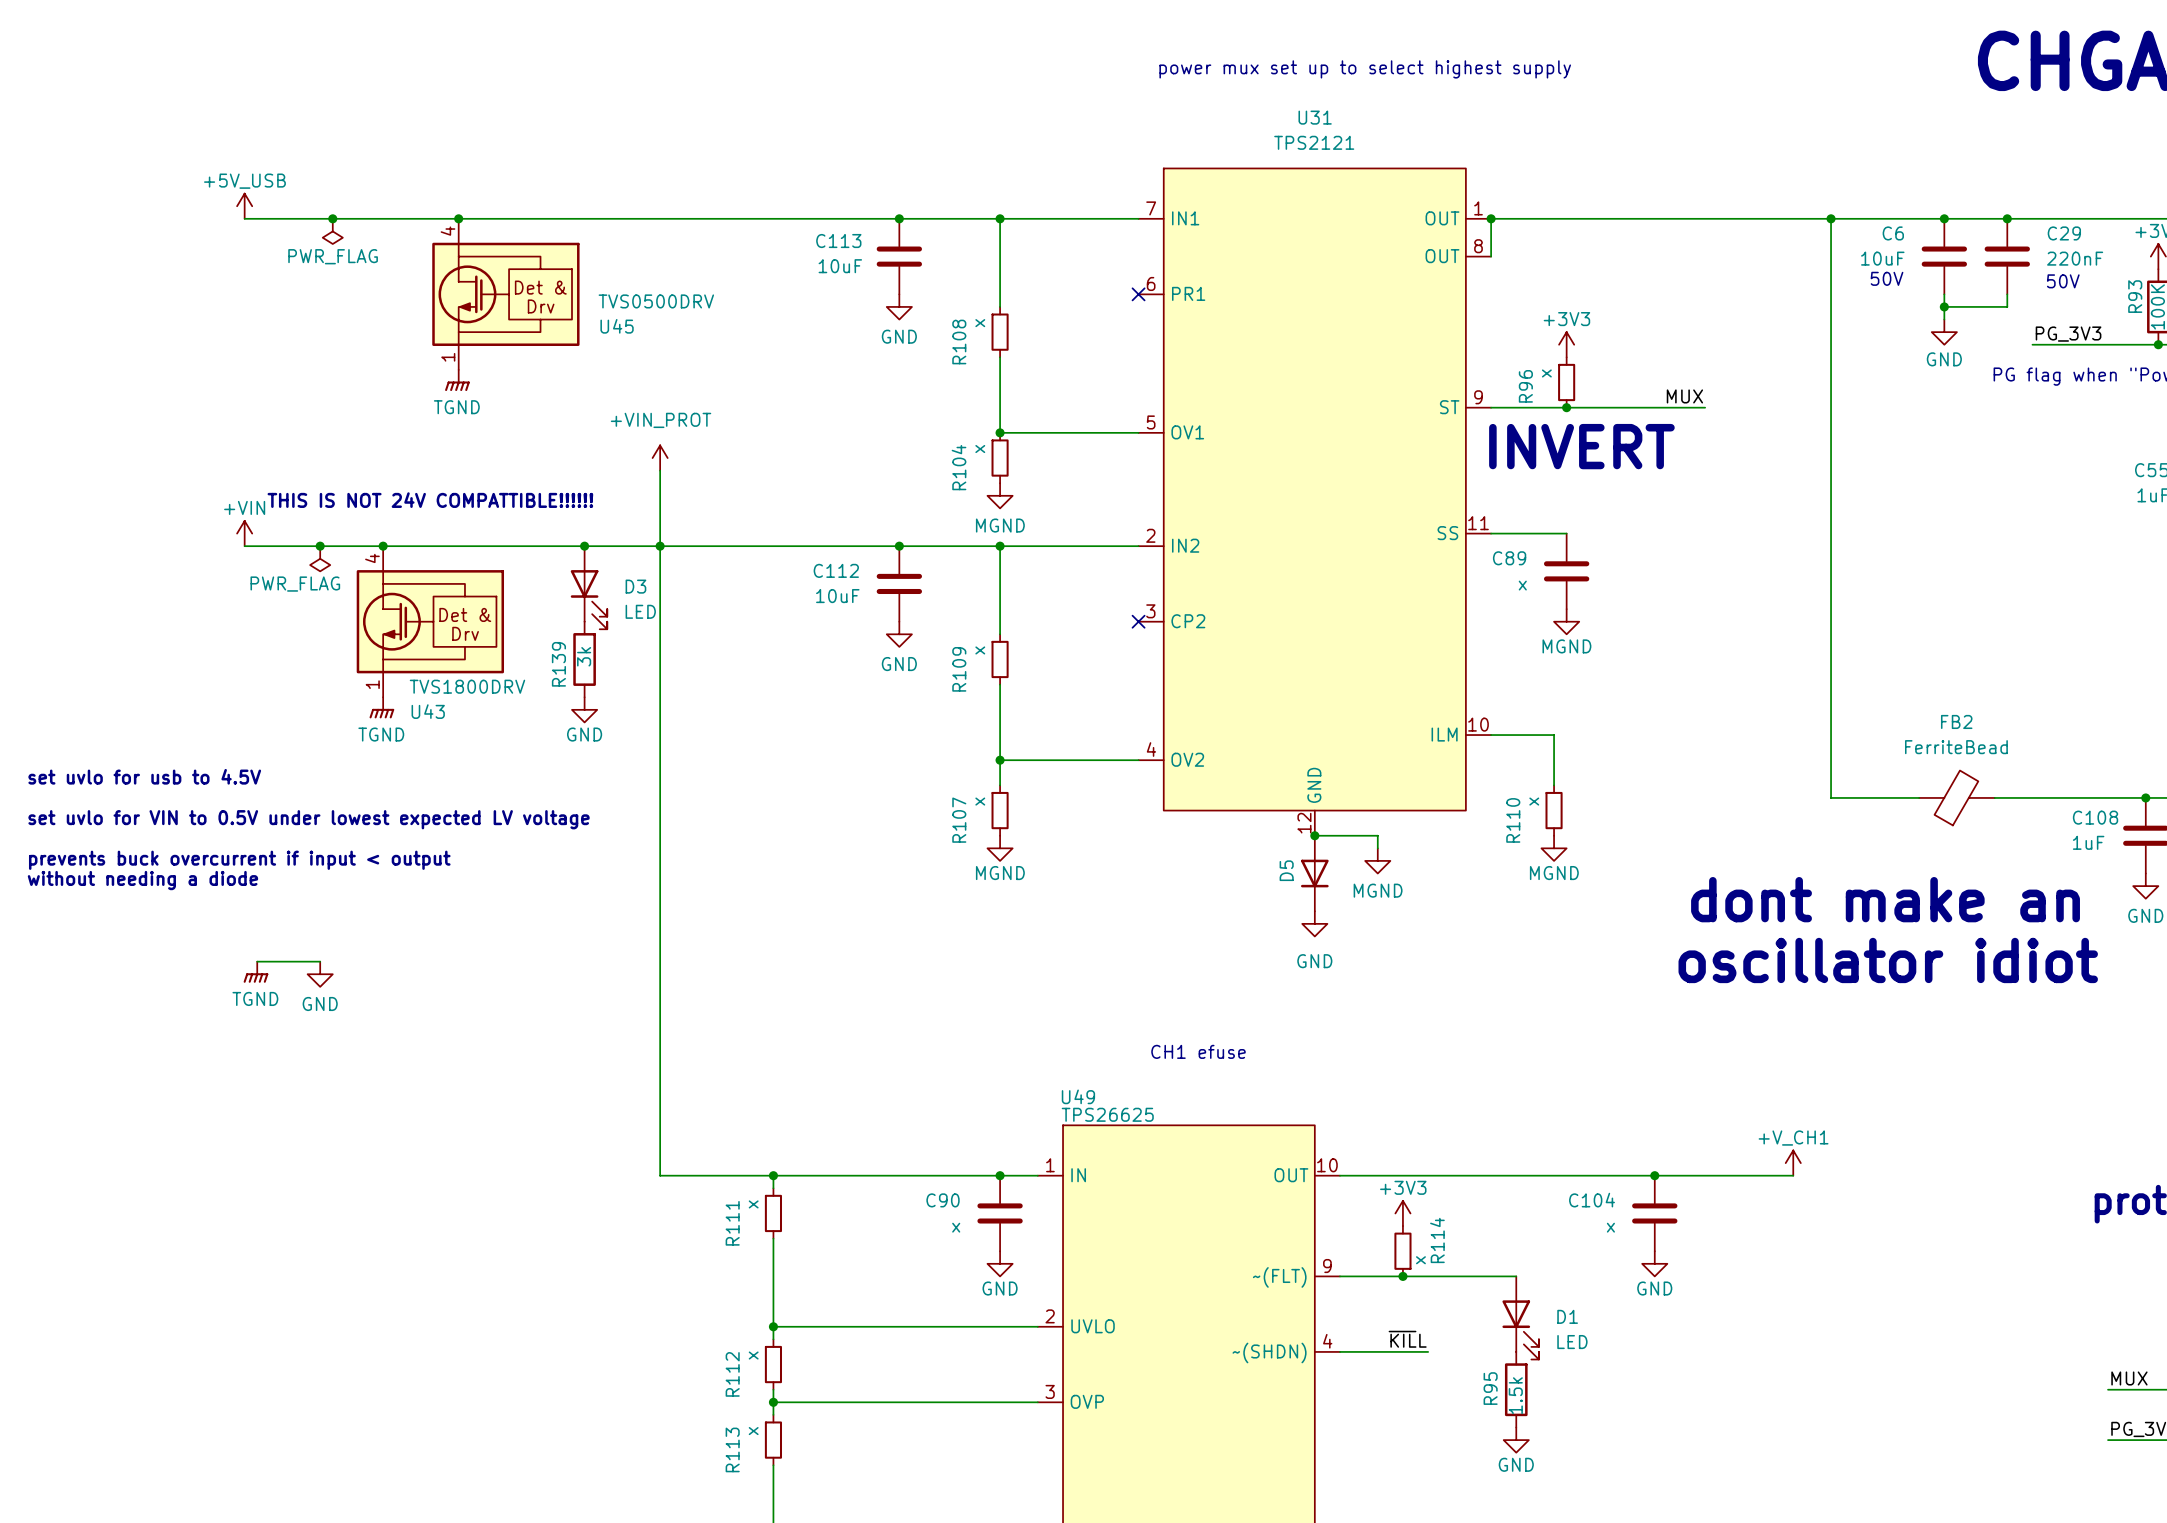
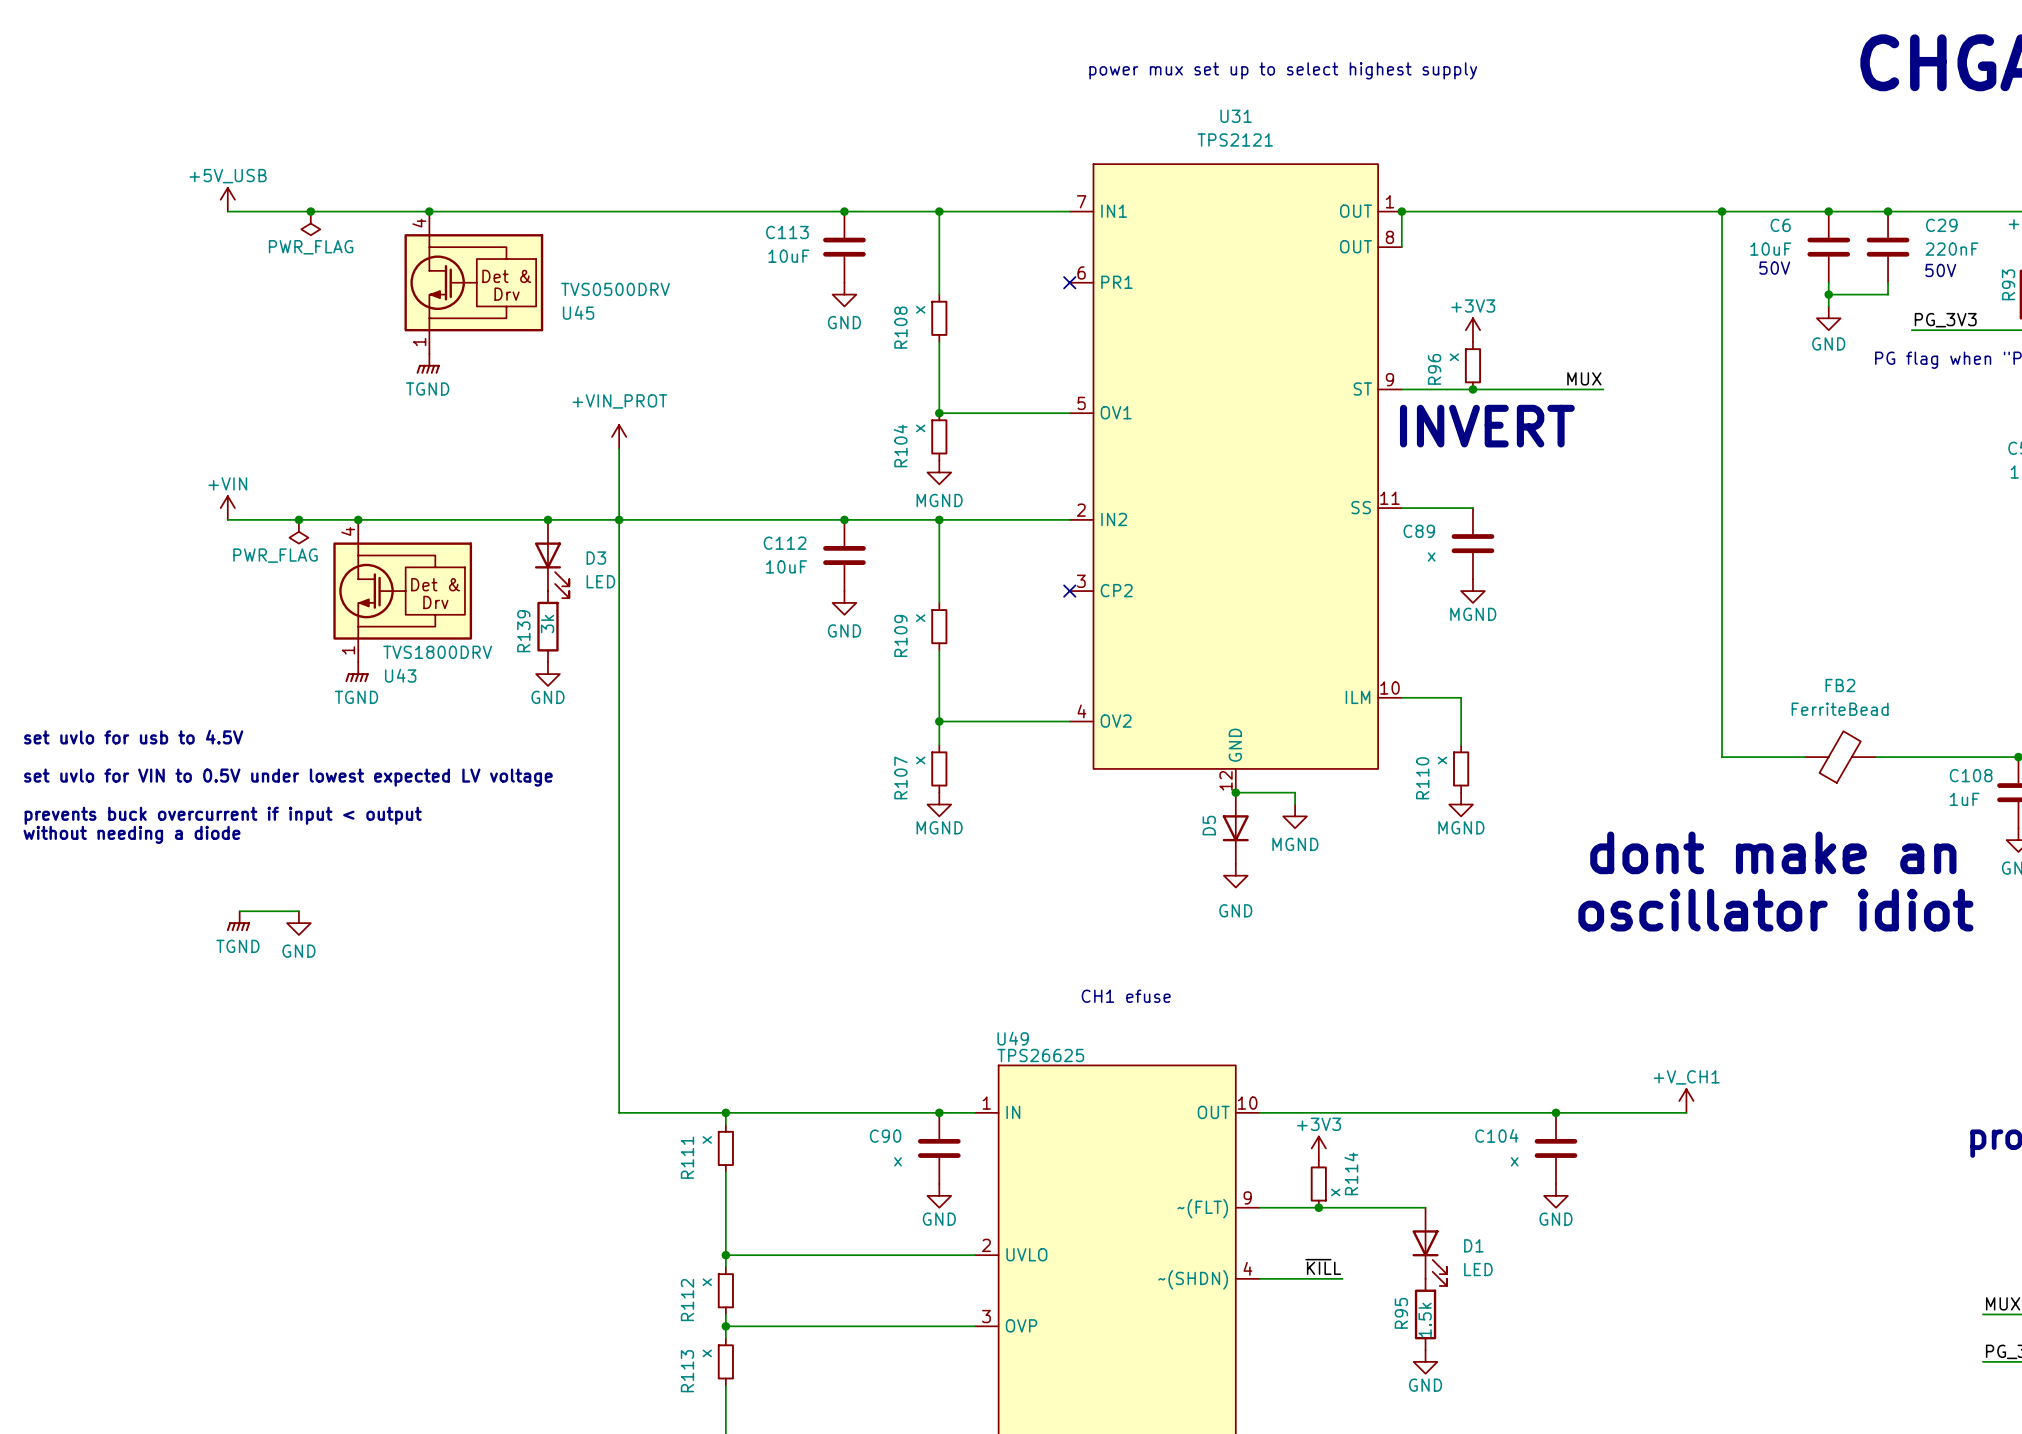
text: THIS IS NOT 24V COMPATTIBLE!!!!!! (430, 500) -> none

